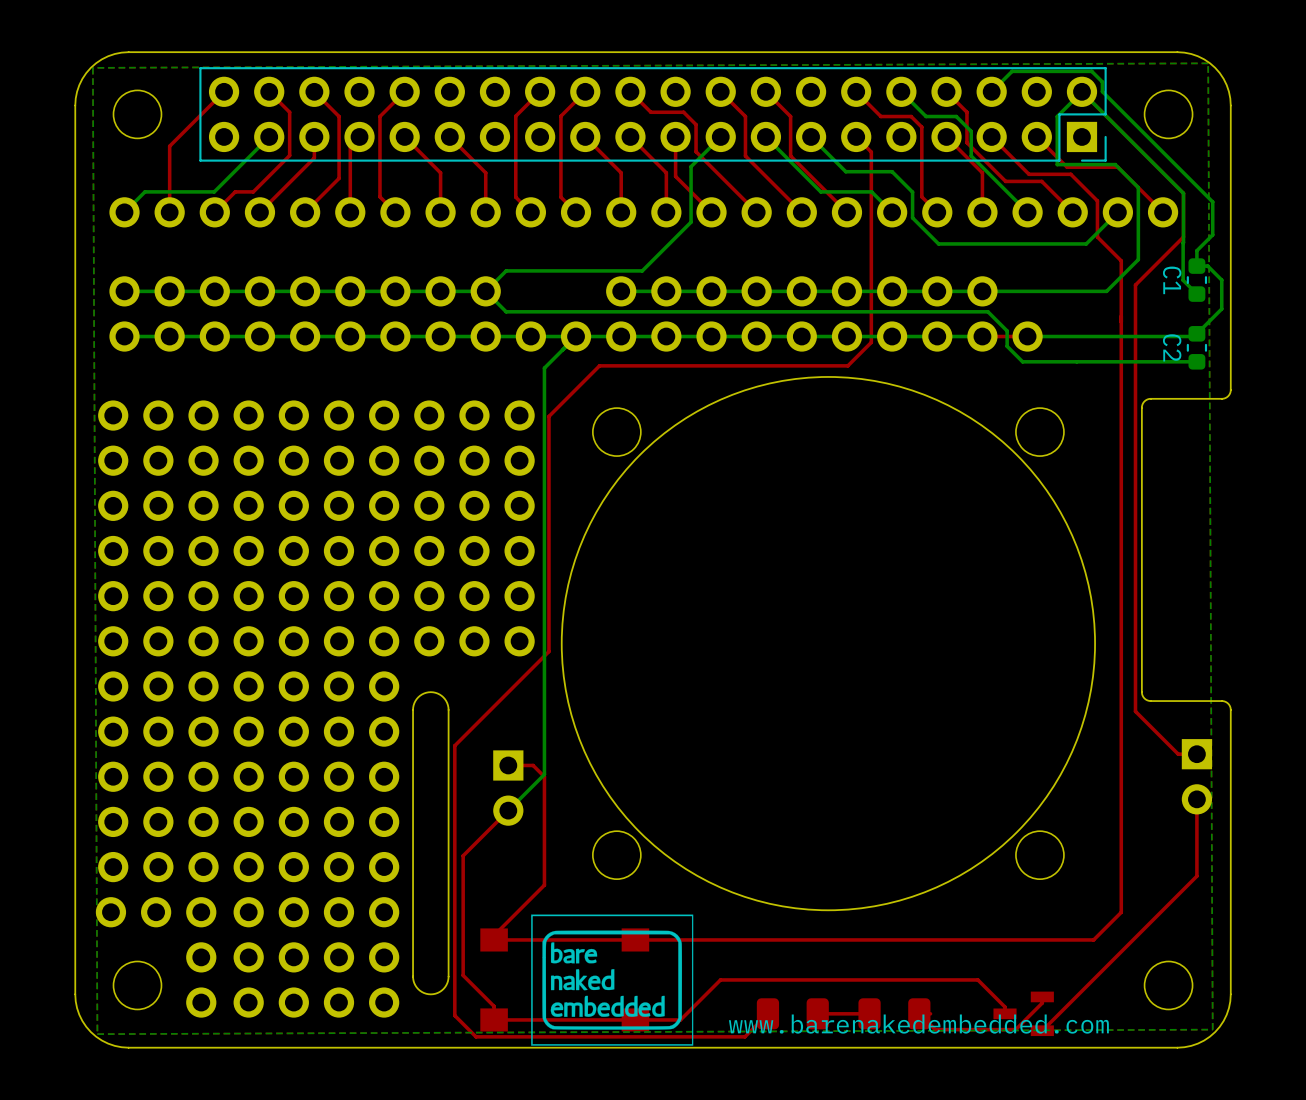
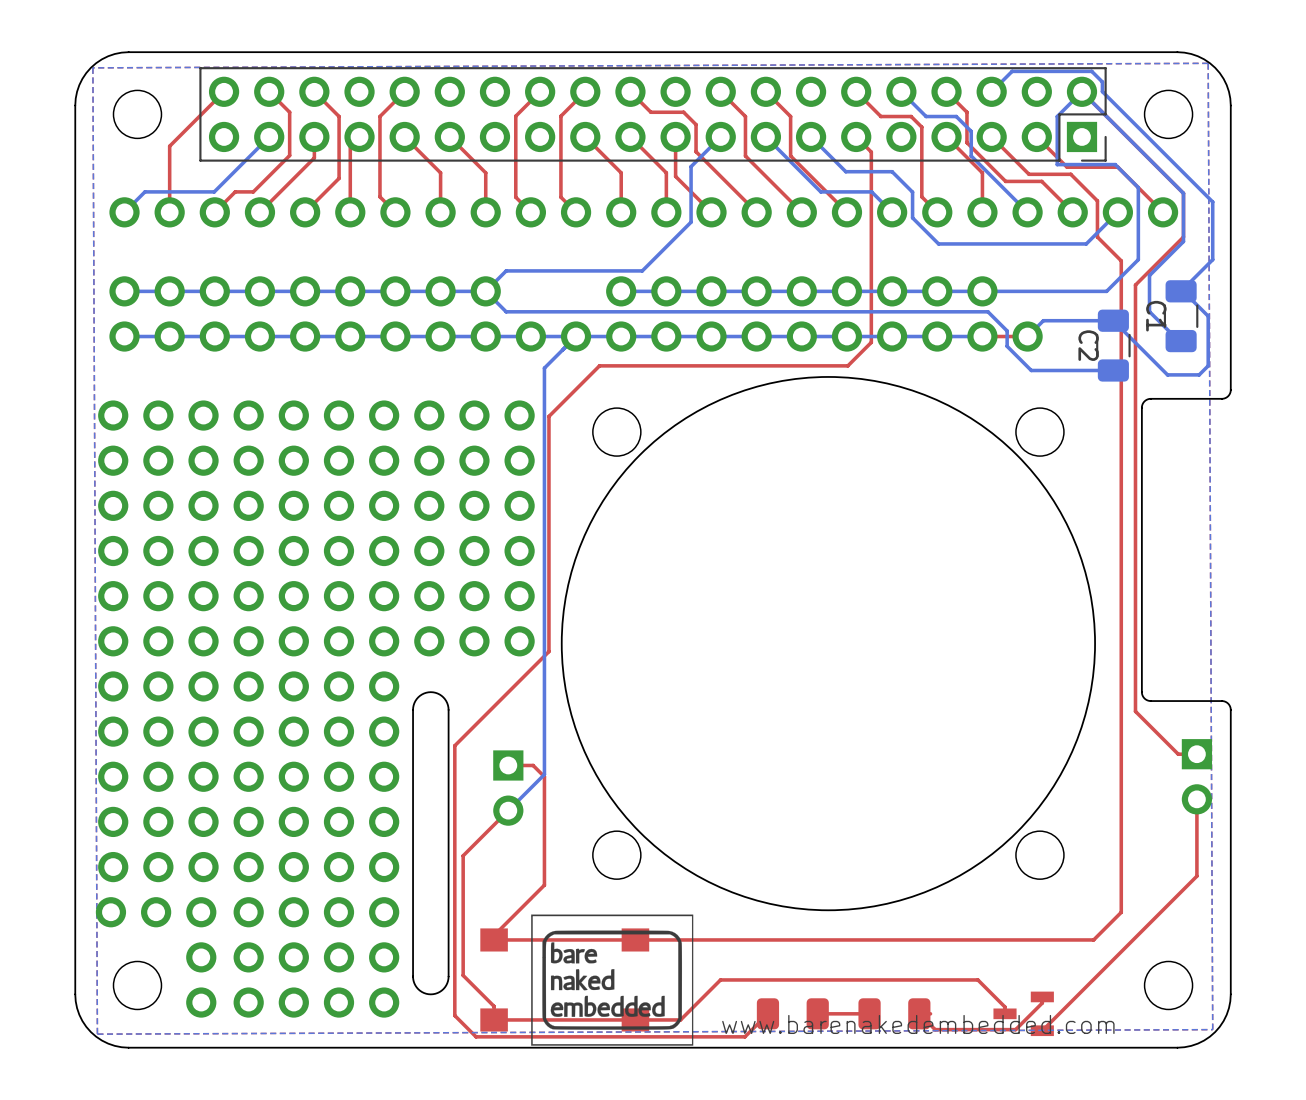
bottom track: (1212, 234) (1196, 250) (1196, 266) (1207, 266) (1221, 280) (1221, 308) (1194, 336) (1027, 336) -> (1212, 234) (1212, 259) (1181, 291) (1208, 316) (1208, 365) (1199, 374) (1167, 374) (1113, 320) (1043, 320) (1030, 333)
bottom track: (1183, 241) (1183, 280) (1196, 294) -> (1183, 241) (1149, 275) (1149, 311) (1178, 341) (1181, 341)
C1 footprint: [1186, 258, 1208, 302] -> [1163, 280, 1199, 353]
C2 footprint: [1186, 326, 1208, 370] -> [1096, 309, 1131, 382]
bottom track: (1196, 361) (1022, 361) -> (1113, 370) (1031, 370) (1022, 361)

